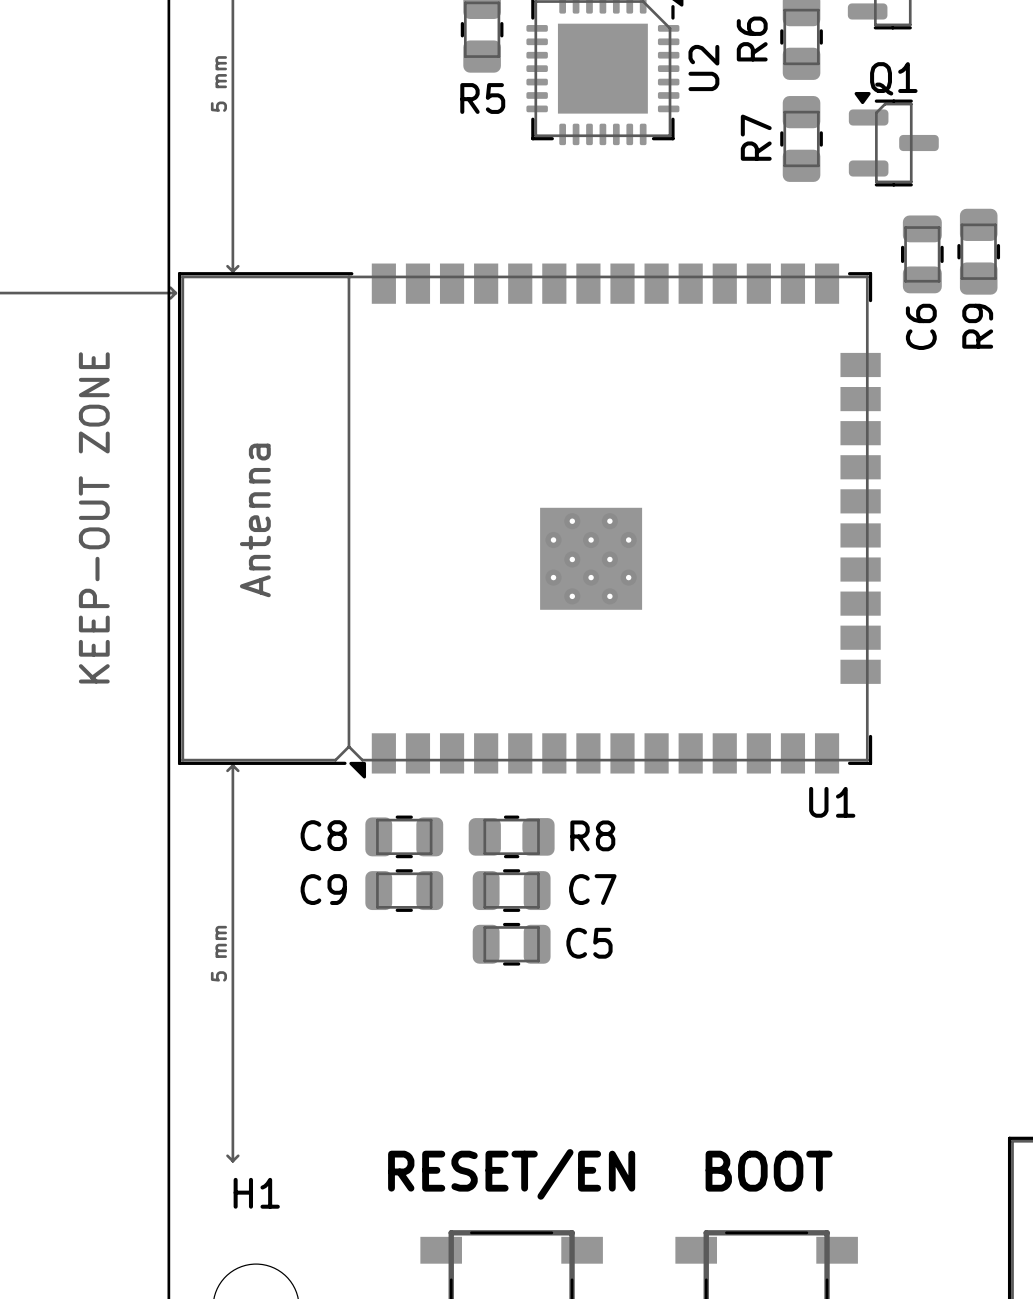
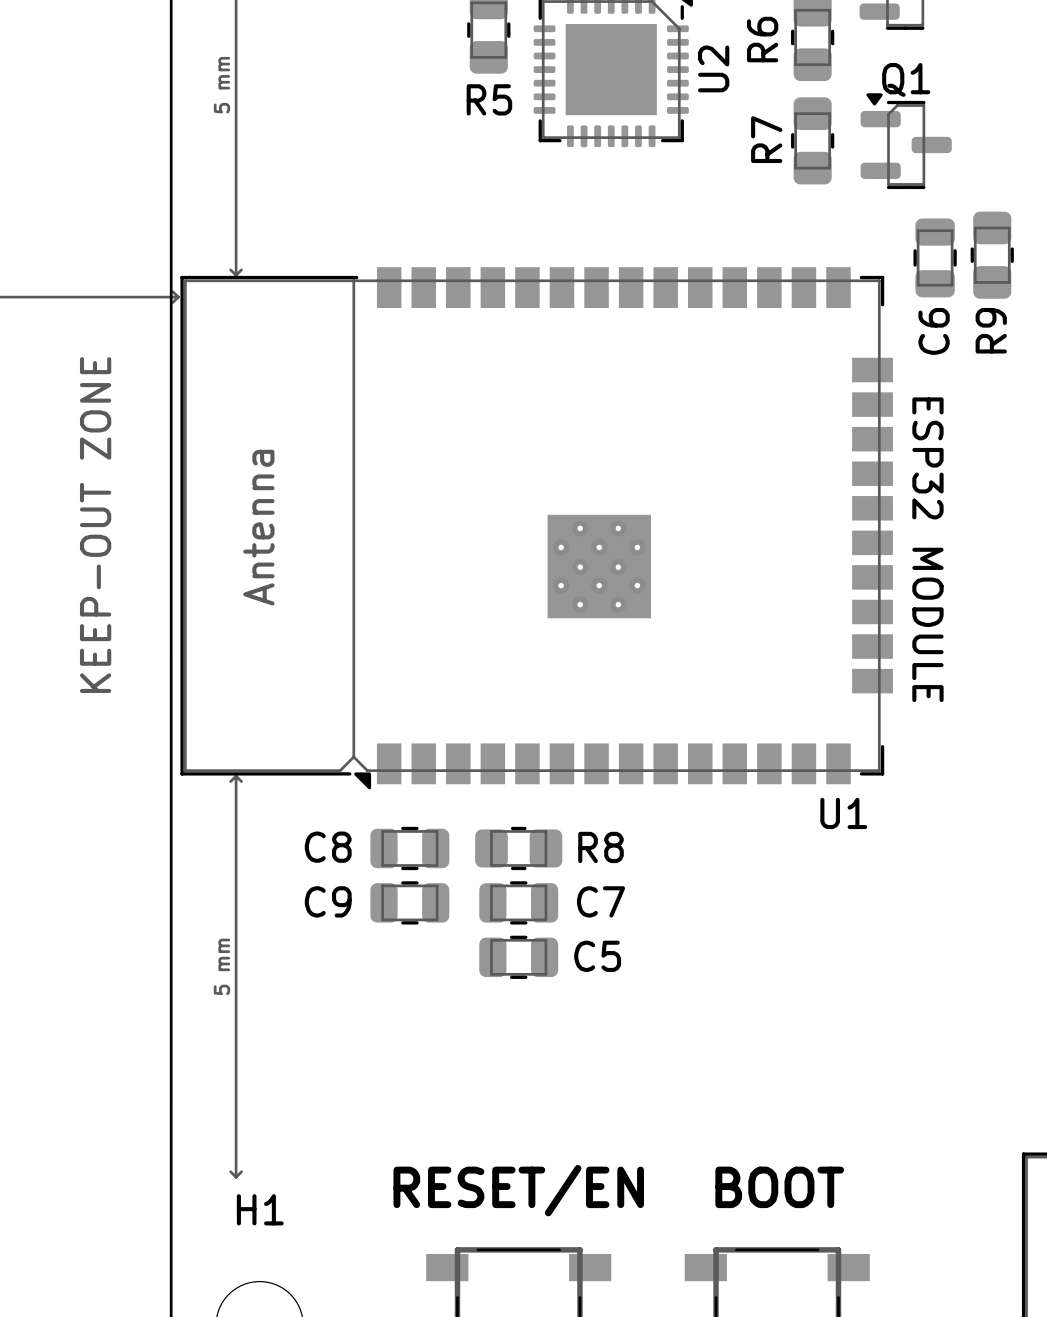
text: none -> ESP32 MODULE (927, 549)

